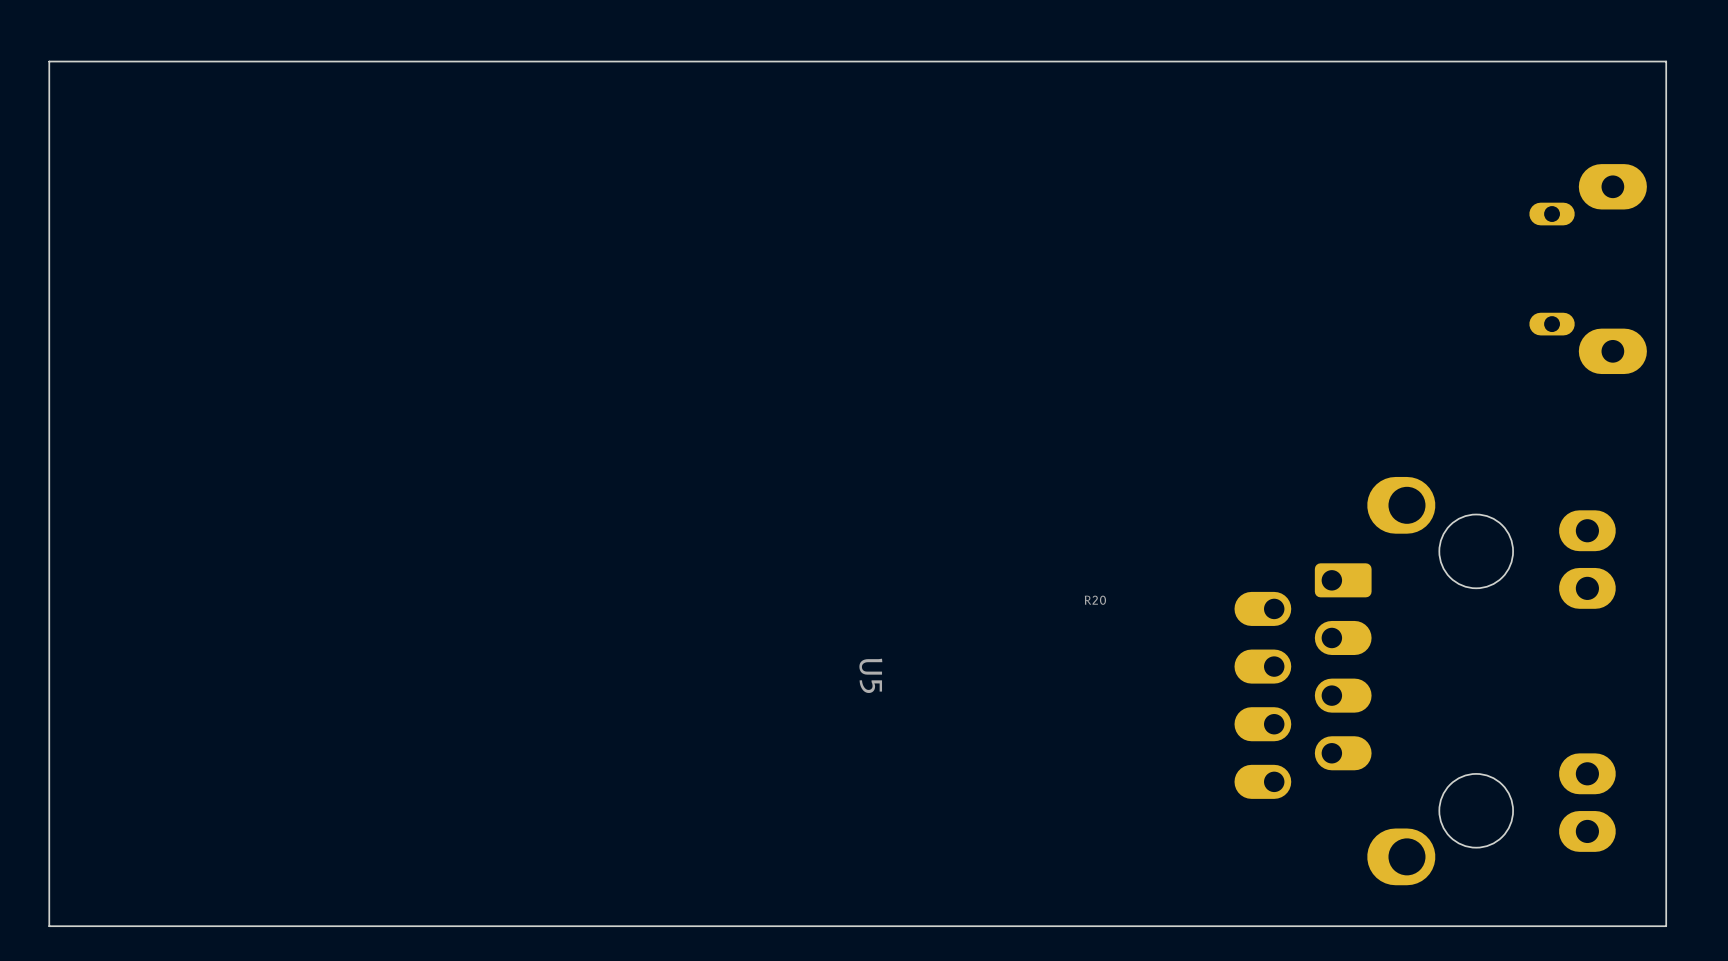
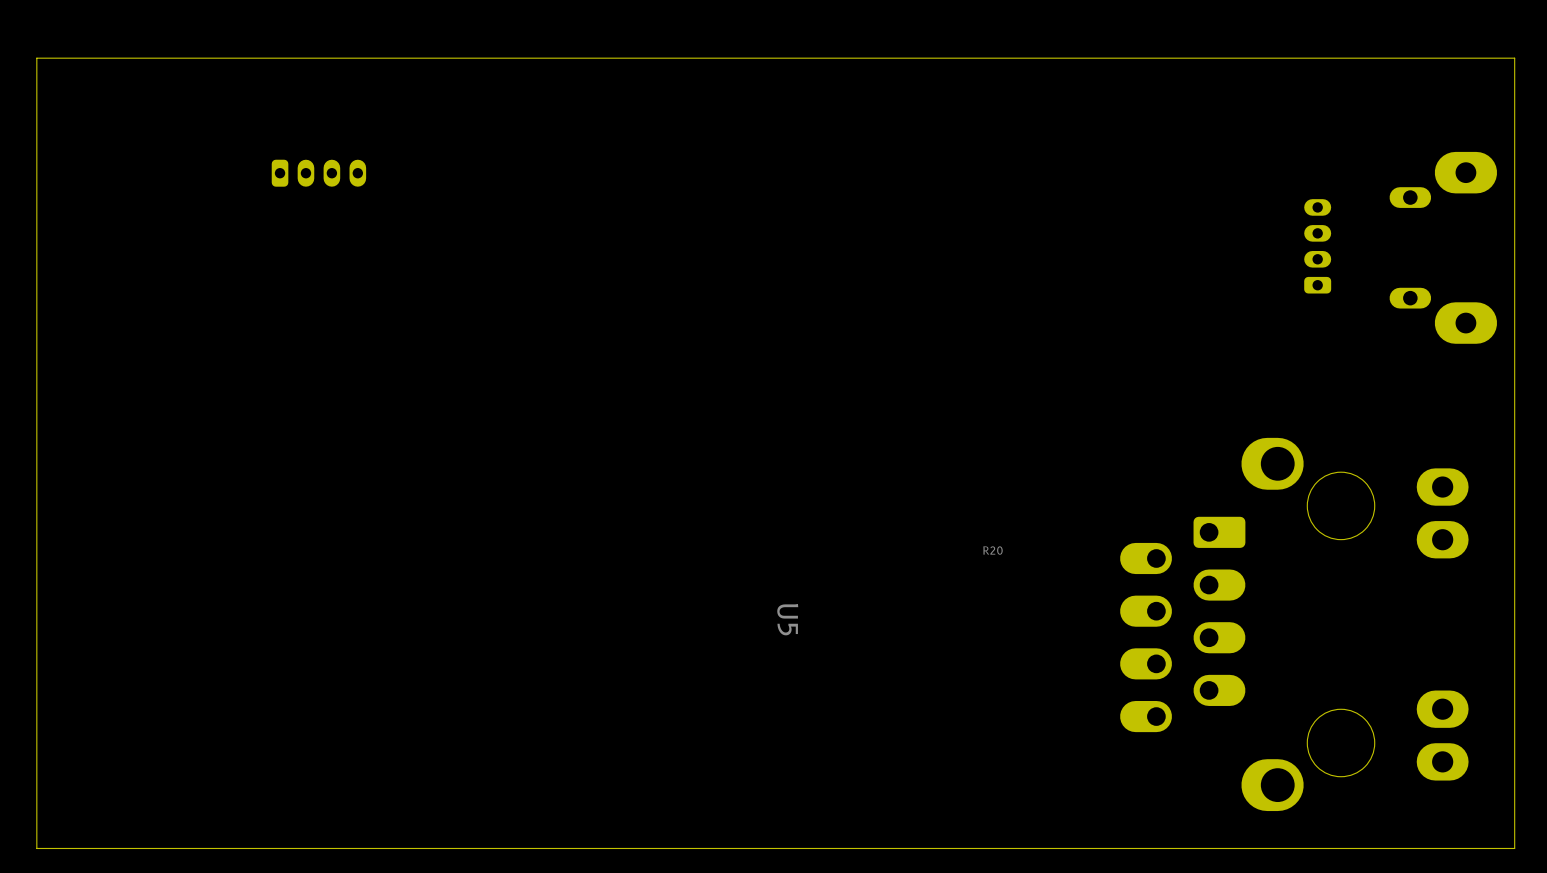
part: none -> (318, 173)
part: none -> (1317, 246)

